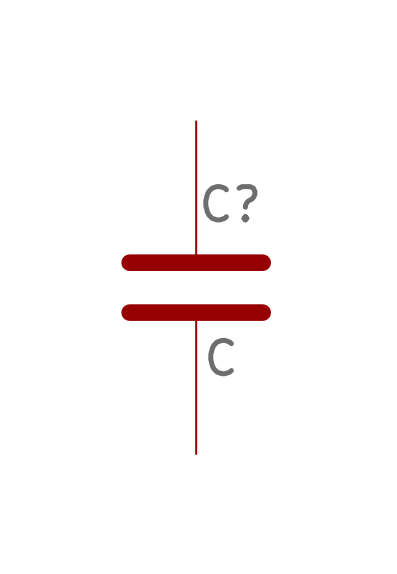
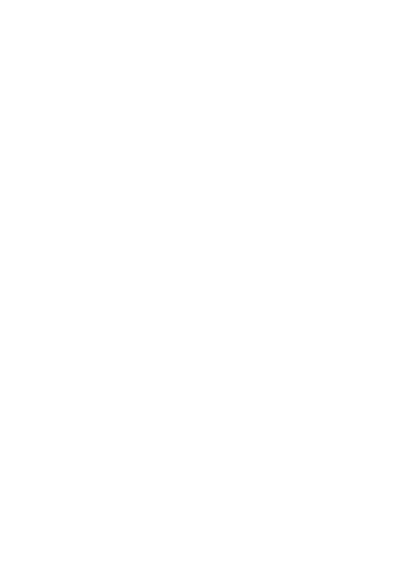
C?: C (196, 287) -> none

